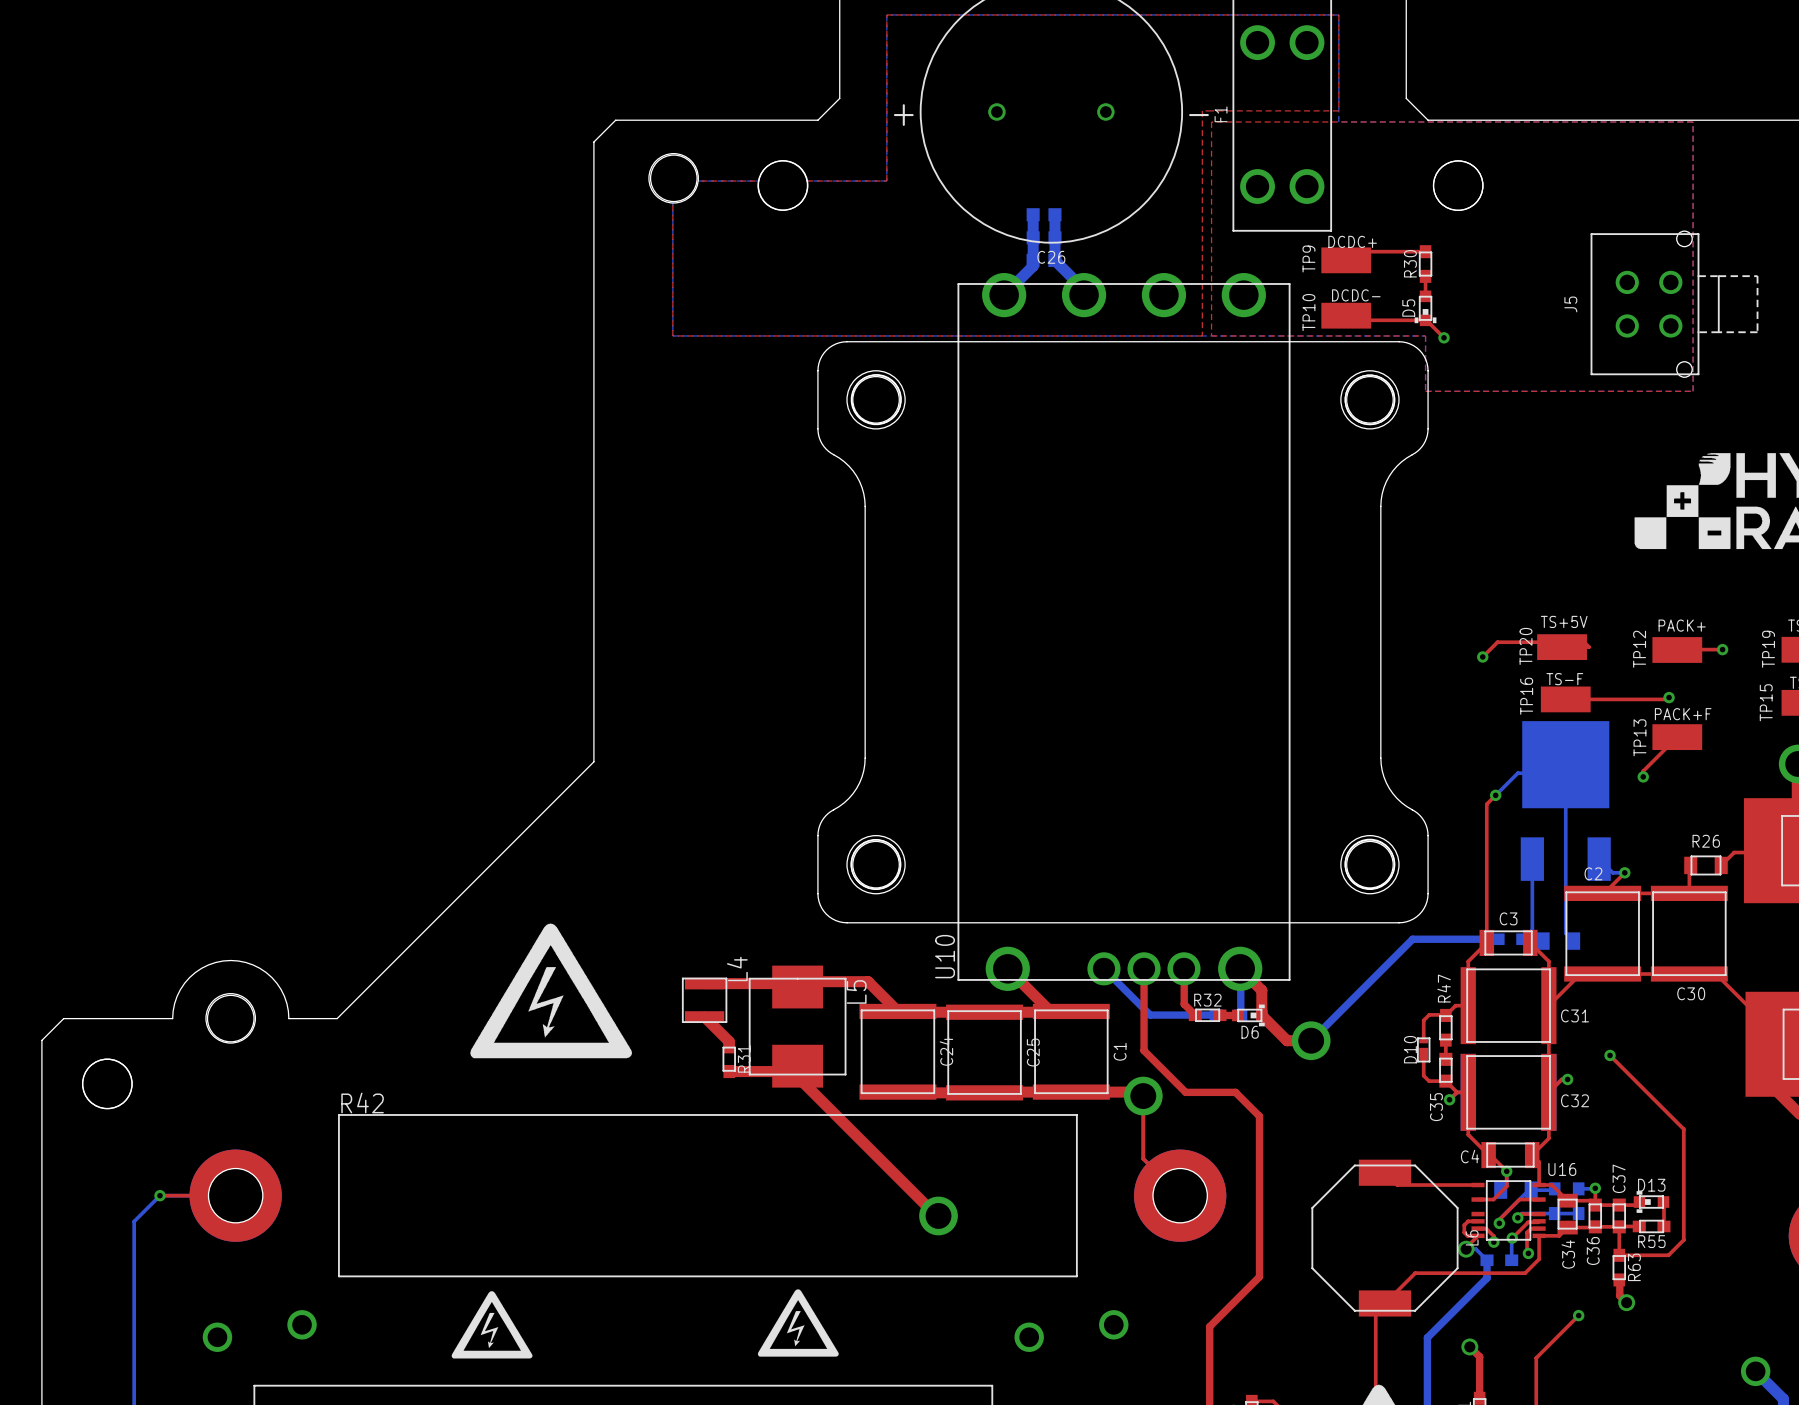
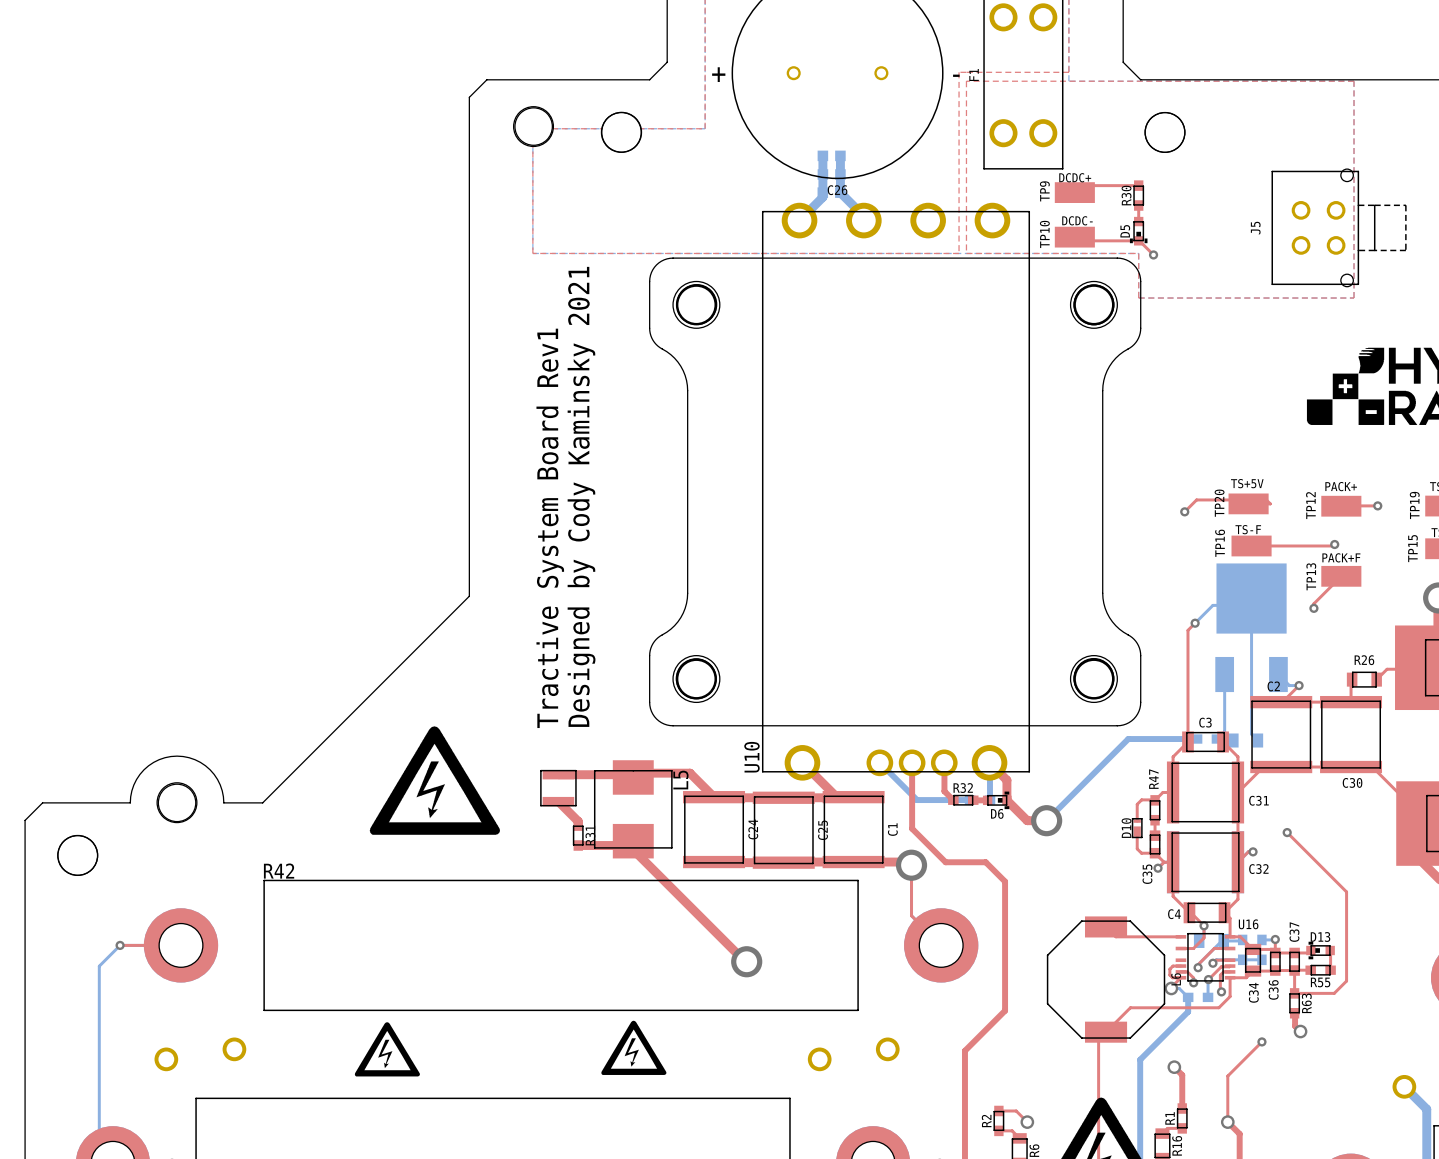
text: none -> Designed by Cody Kaminsky 2021 (581, 496)
text: none -> Tractive System Board Rev1 (550, 528)
L4 name: L4 (737, 968) -> none

